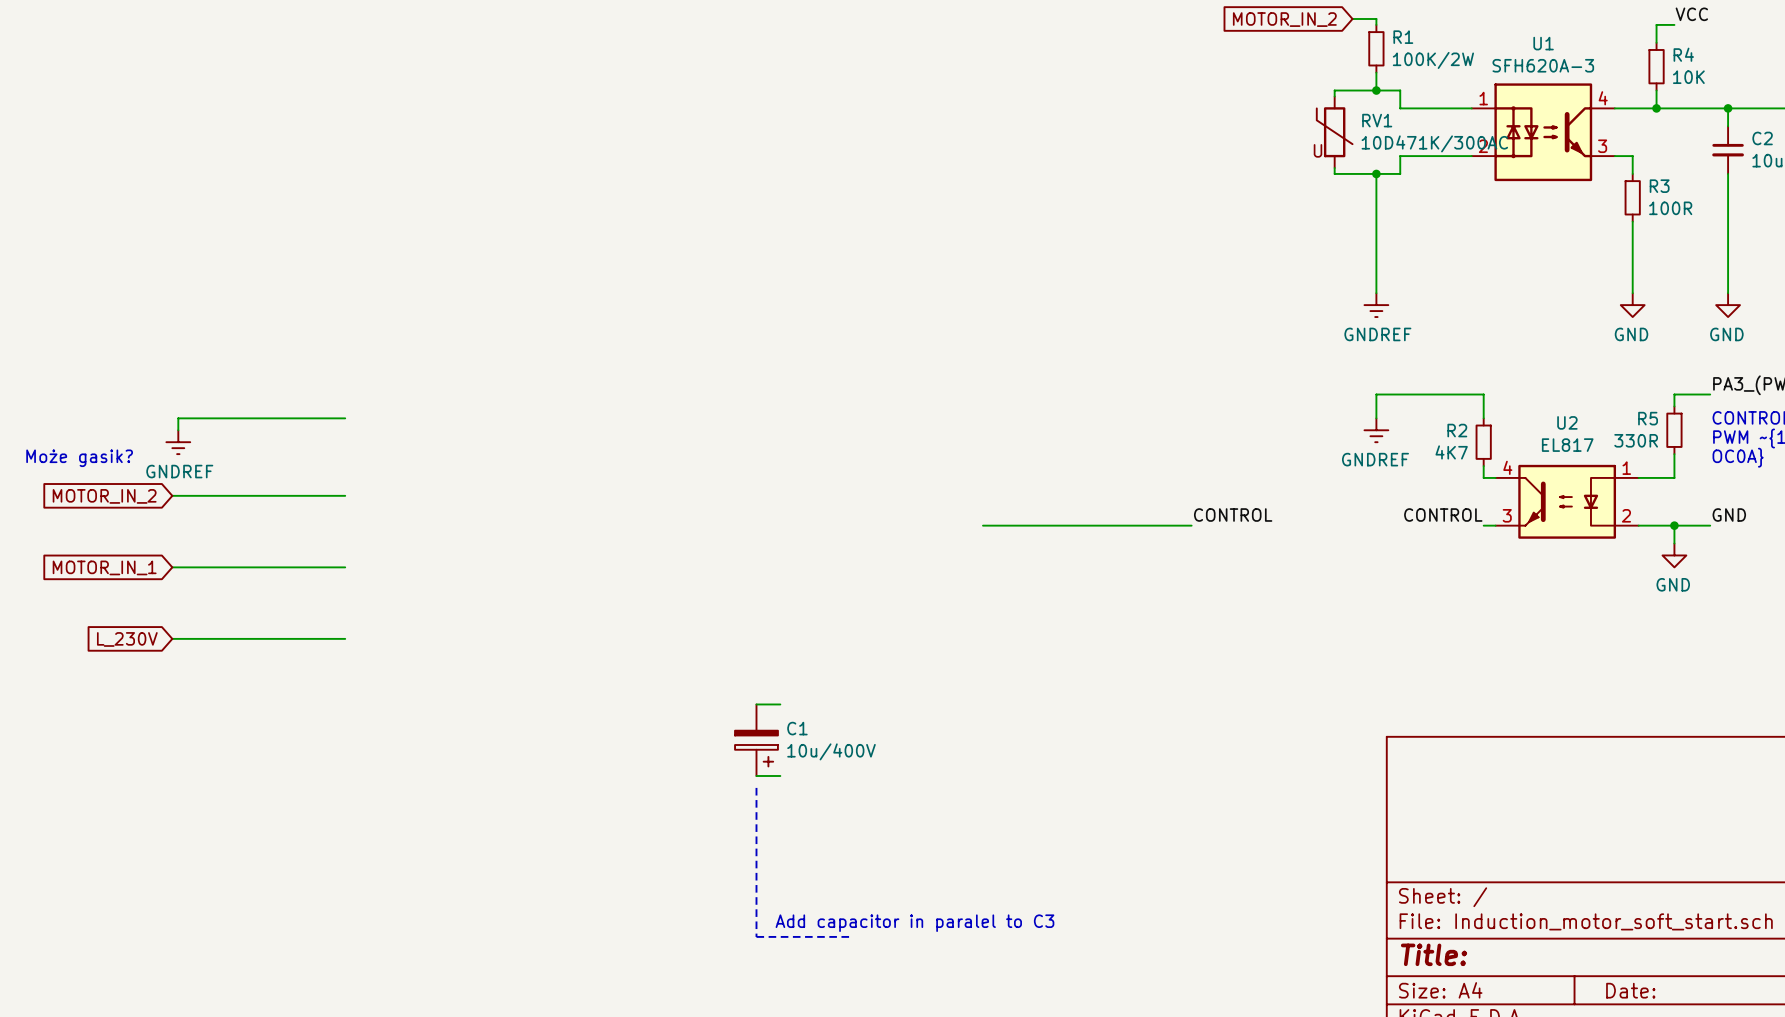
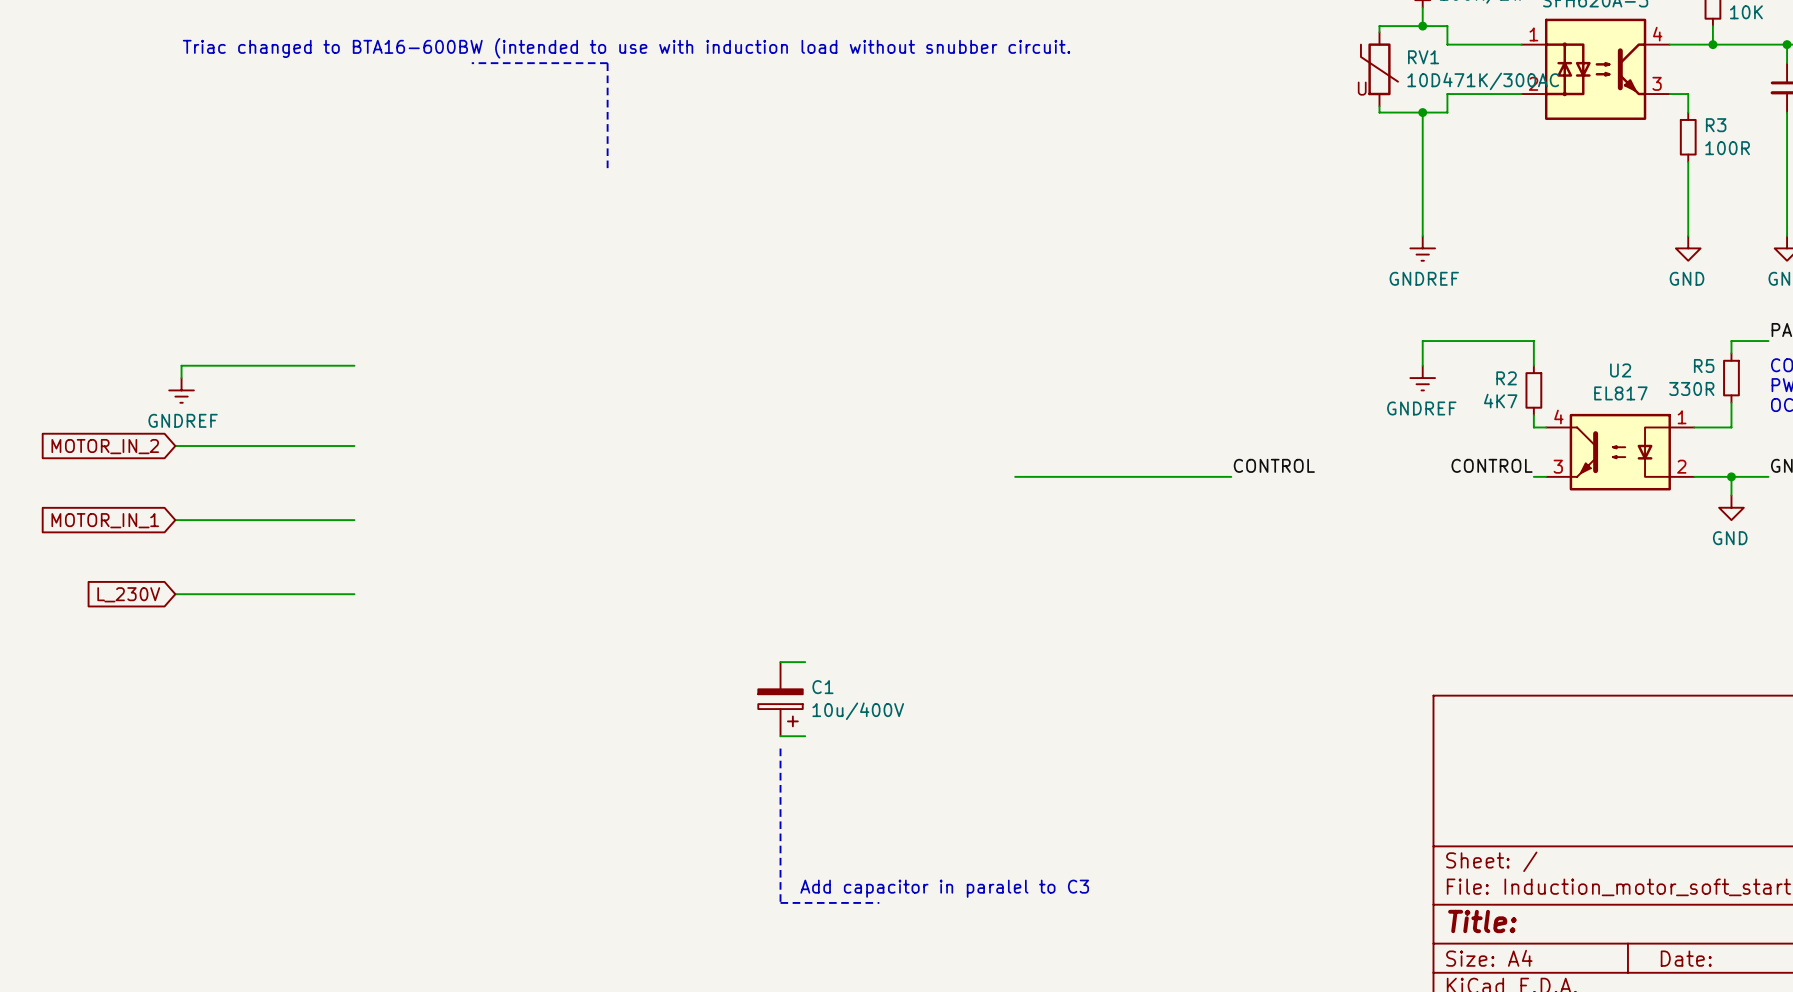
text: none -> Triac changed to BTA16-600BW (intended to use with induction load without snubber circuit. (626, 48)
line: none -> (471, 63) (607, 63) (607, 168)
text: Może gasik? (79, 458) -> none

